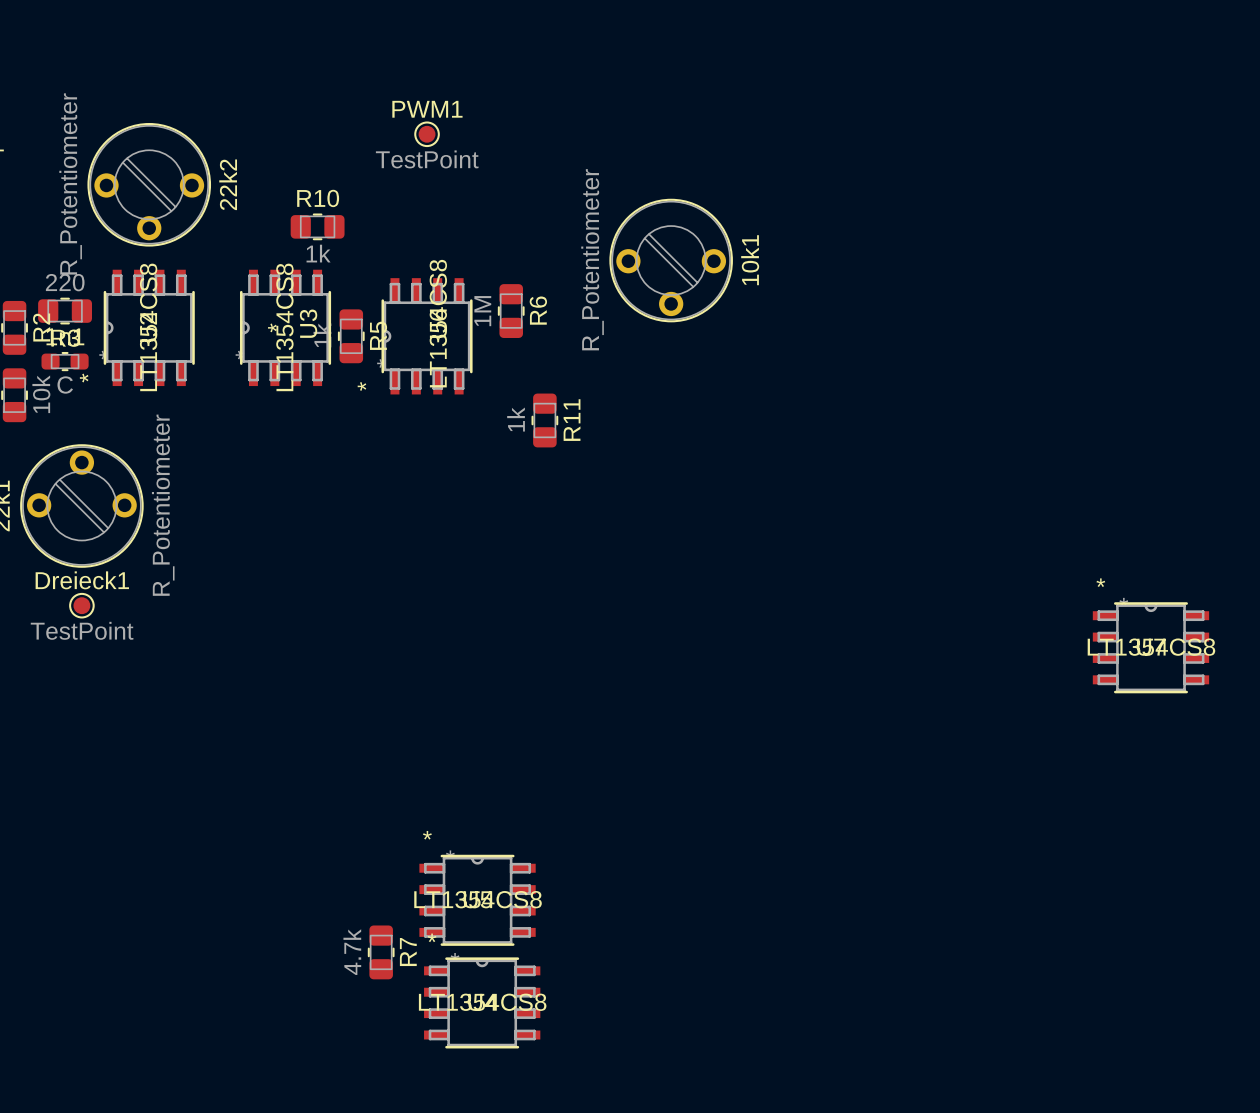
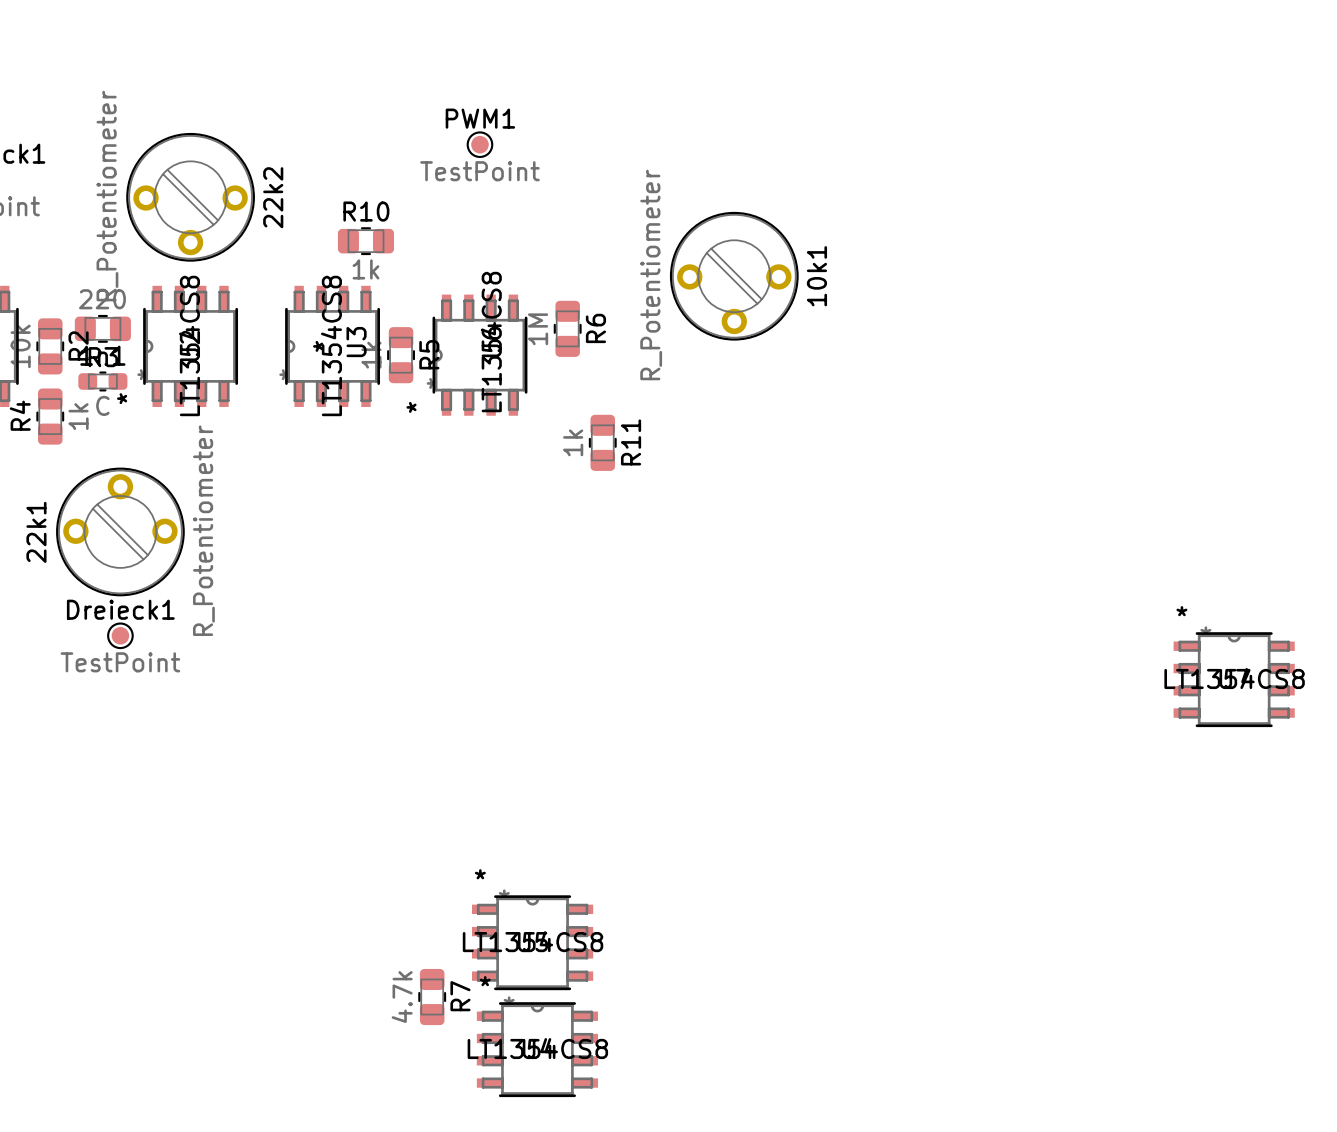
R4 value: 10k (41, 394) -> 1k (78, 416)

